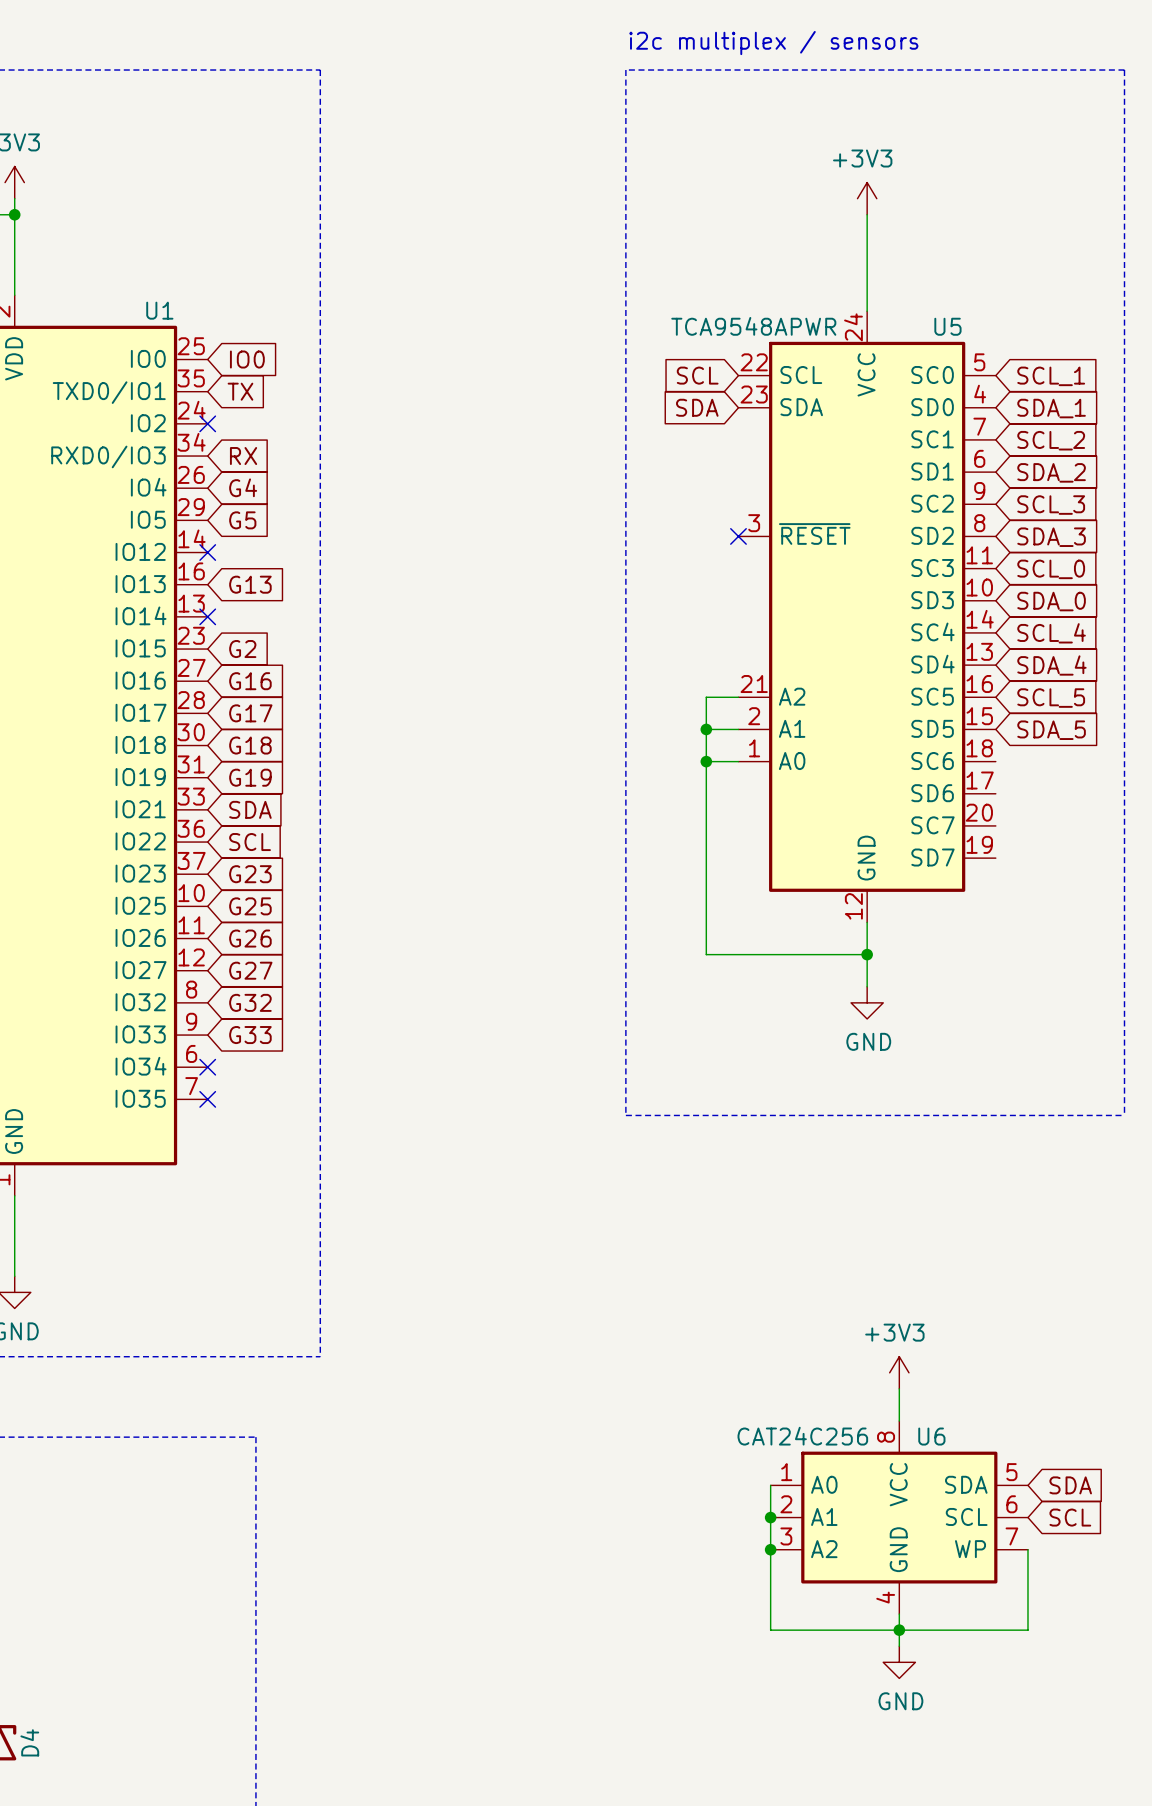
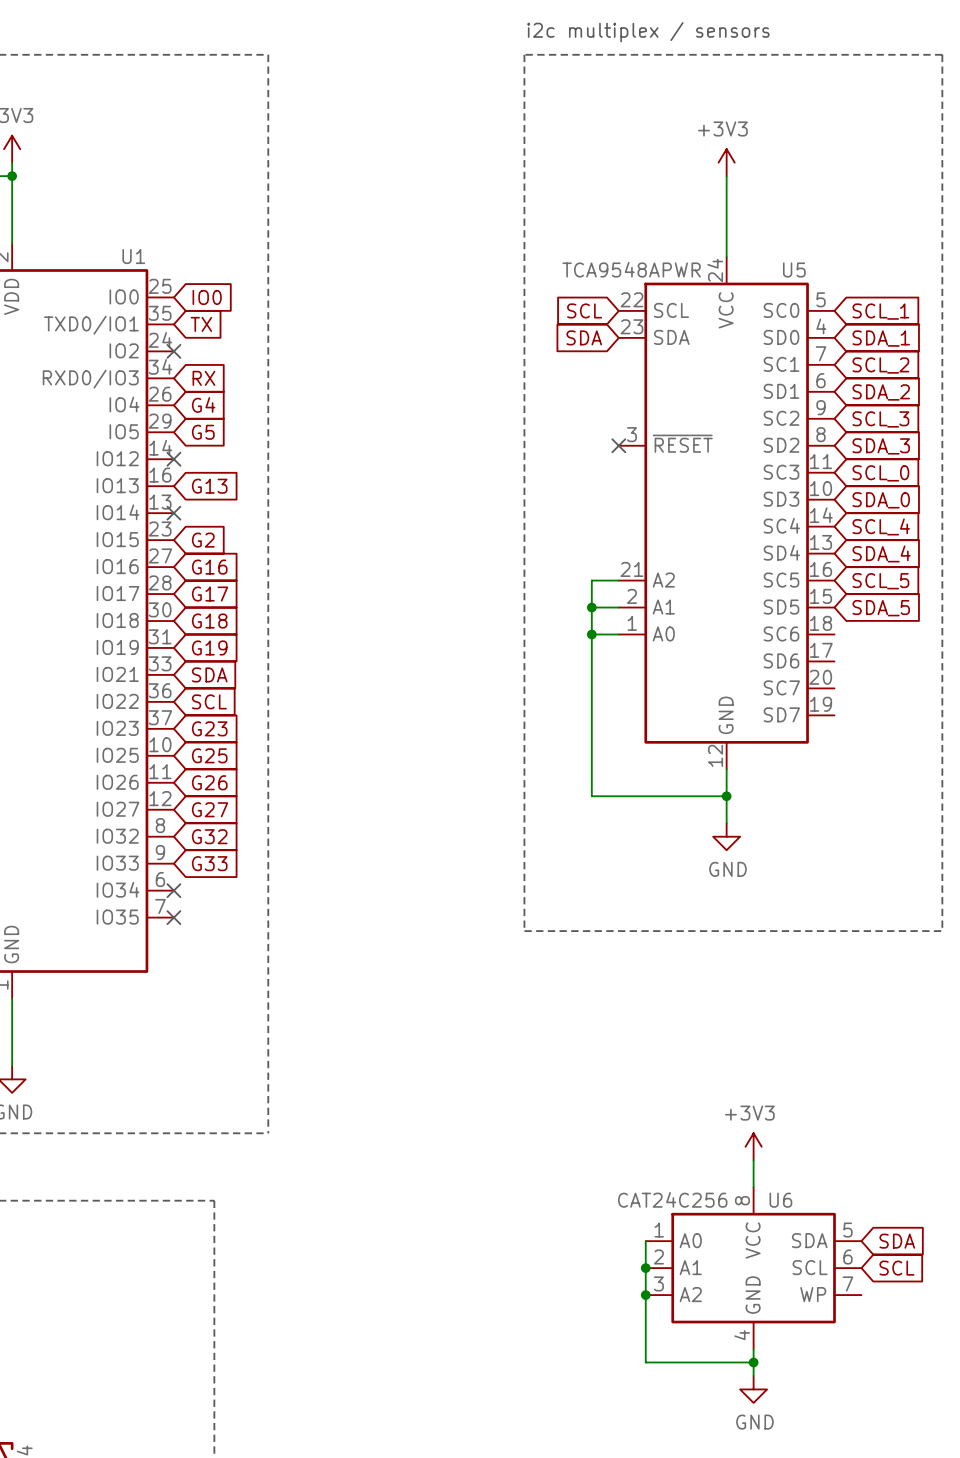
wire: (1027, 1549) (1027, 1630) (899, 1630) -> none

